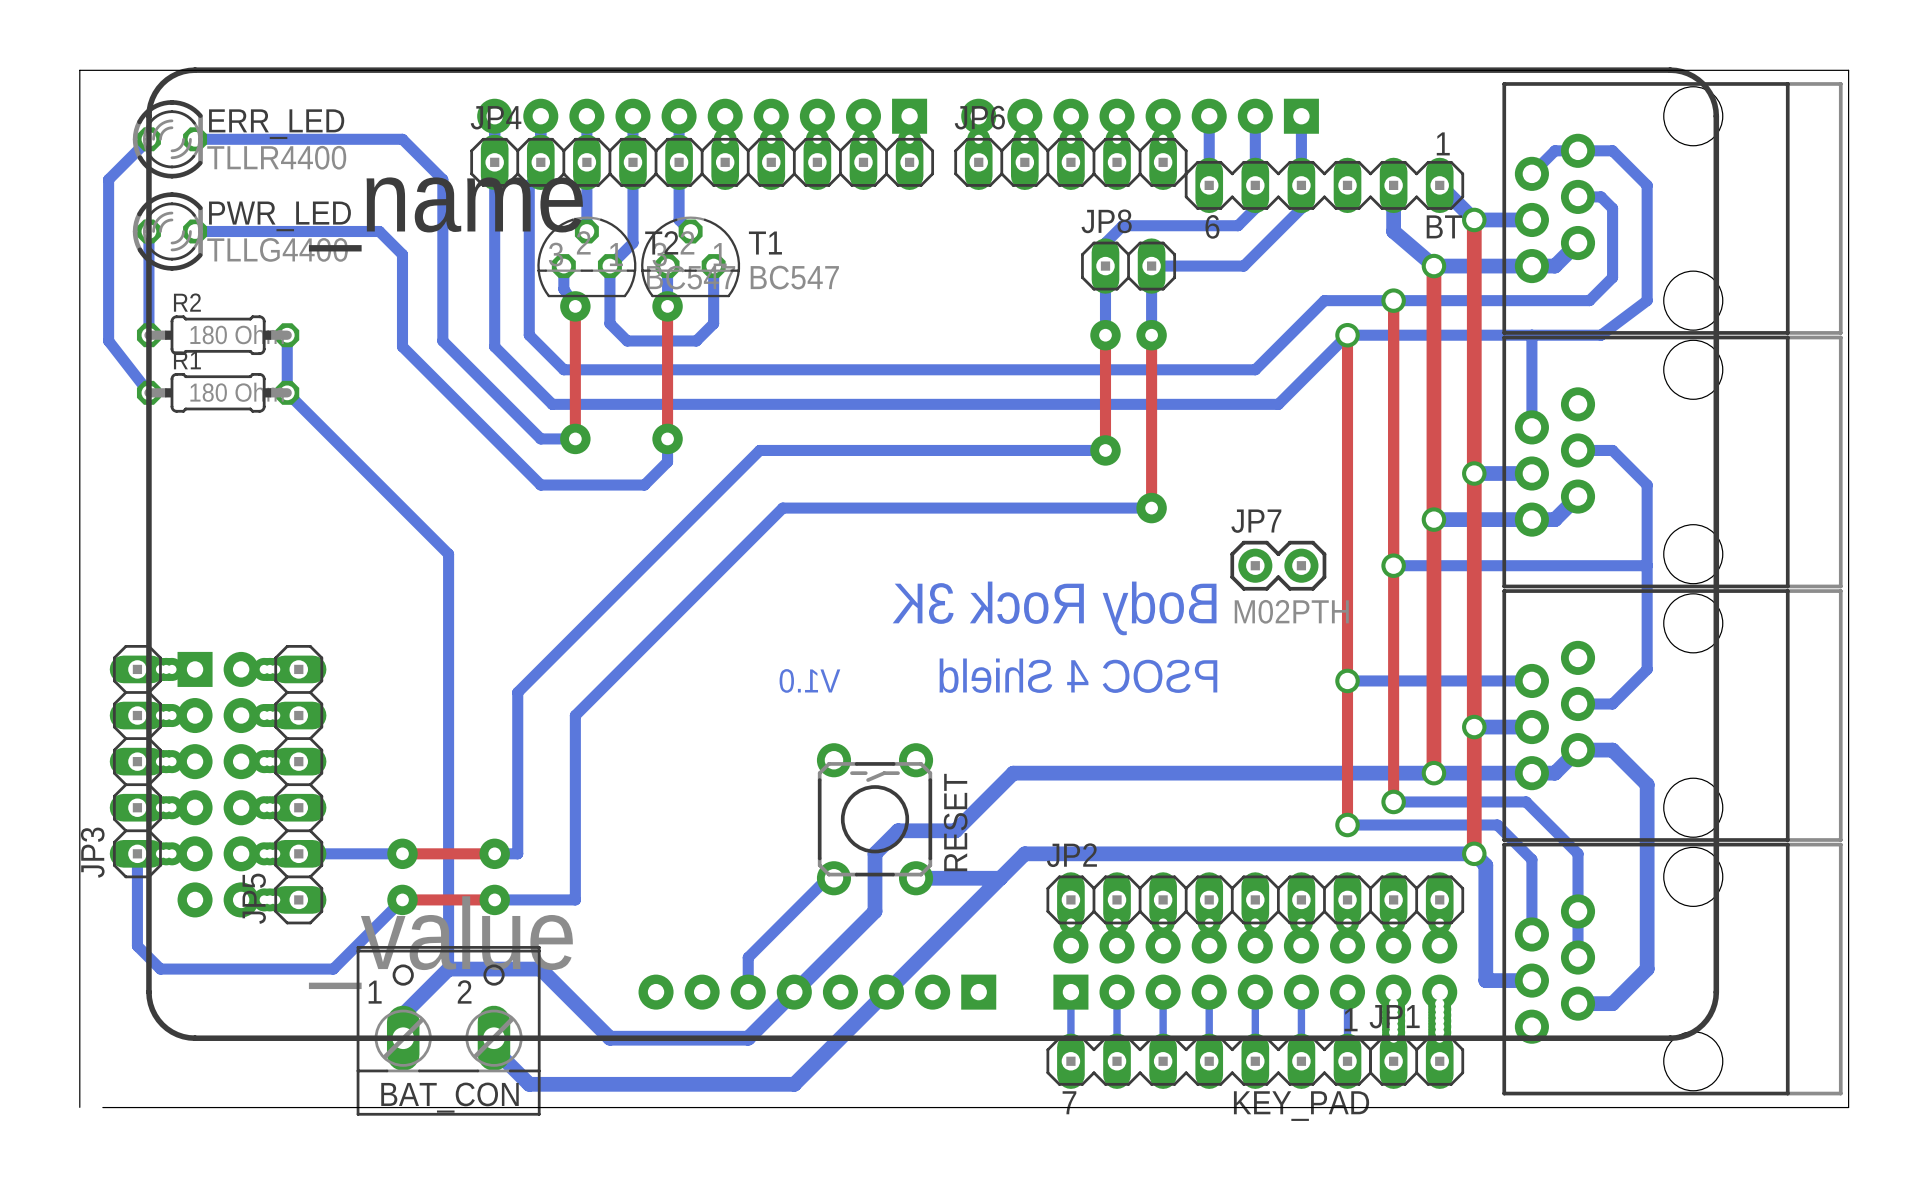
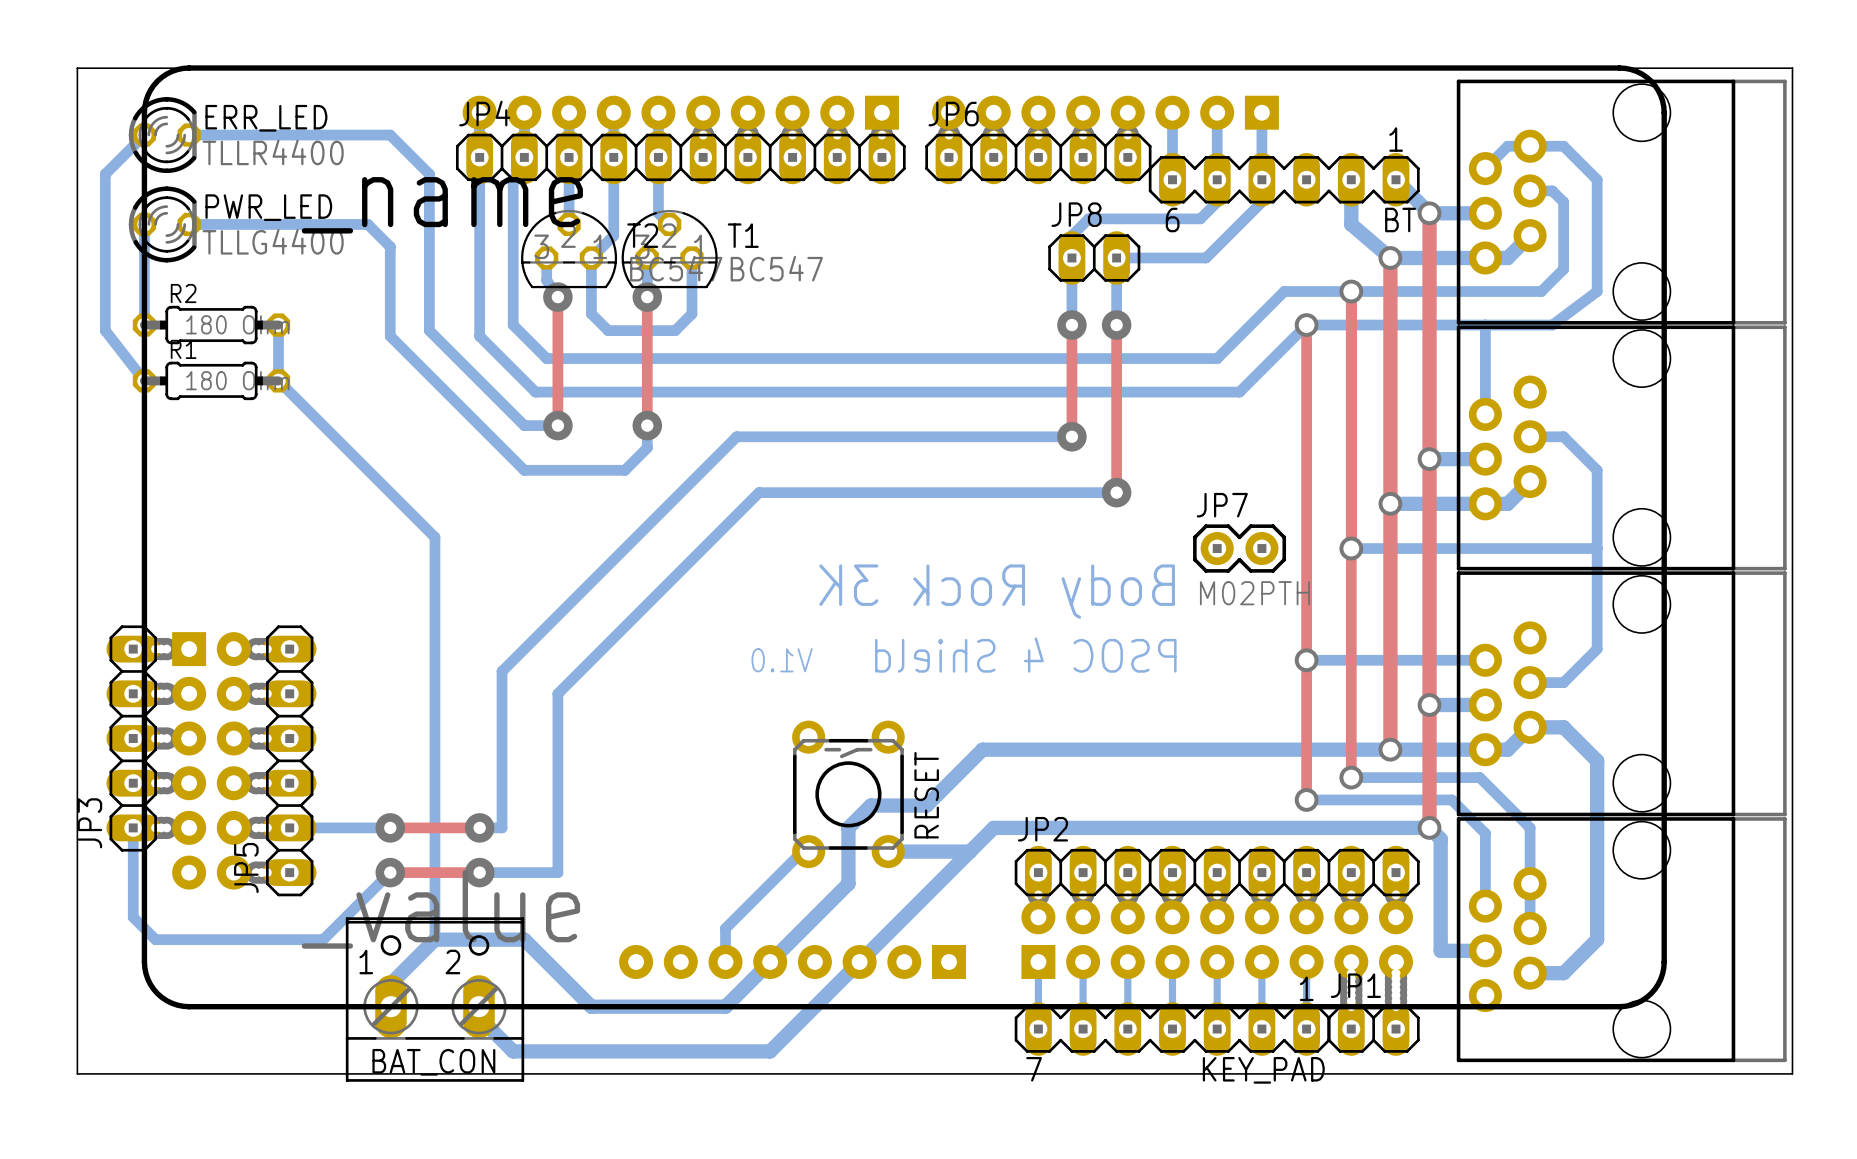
board edge: none -> (77, 1073) (99, 1073)

